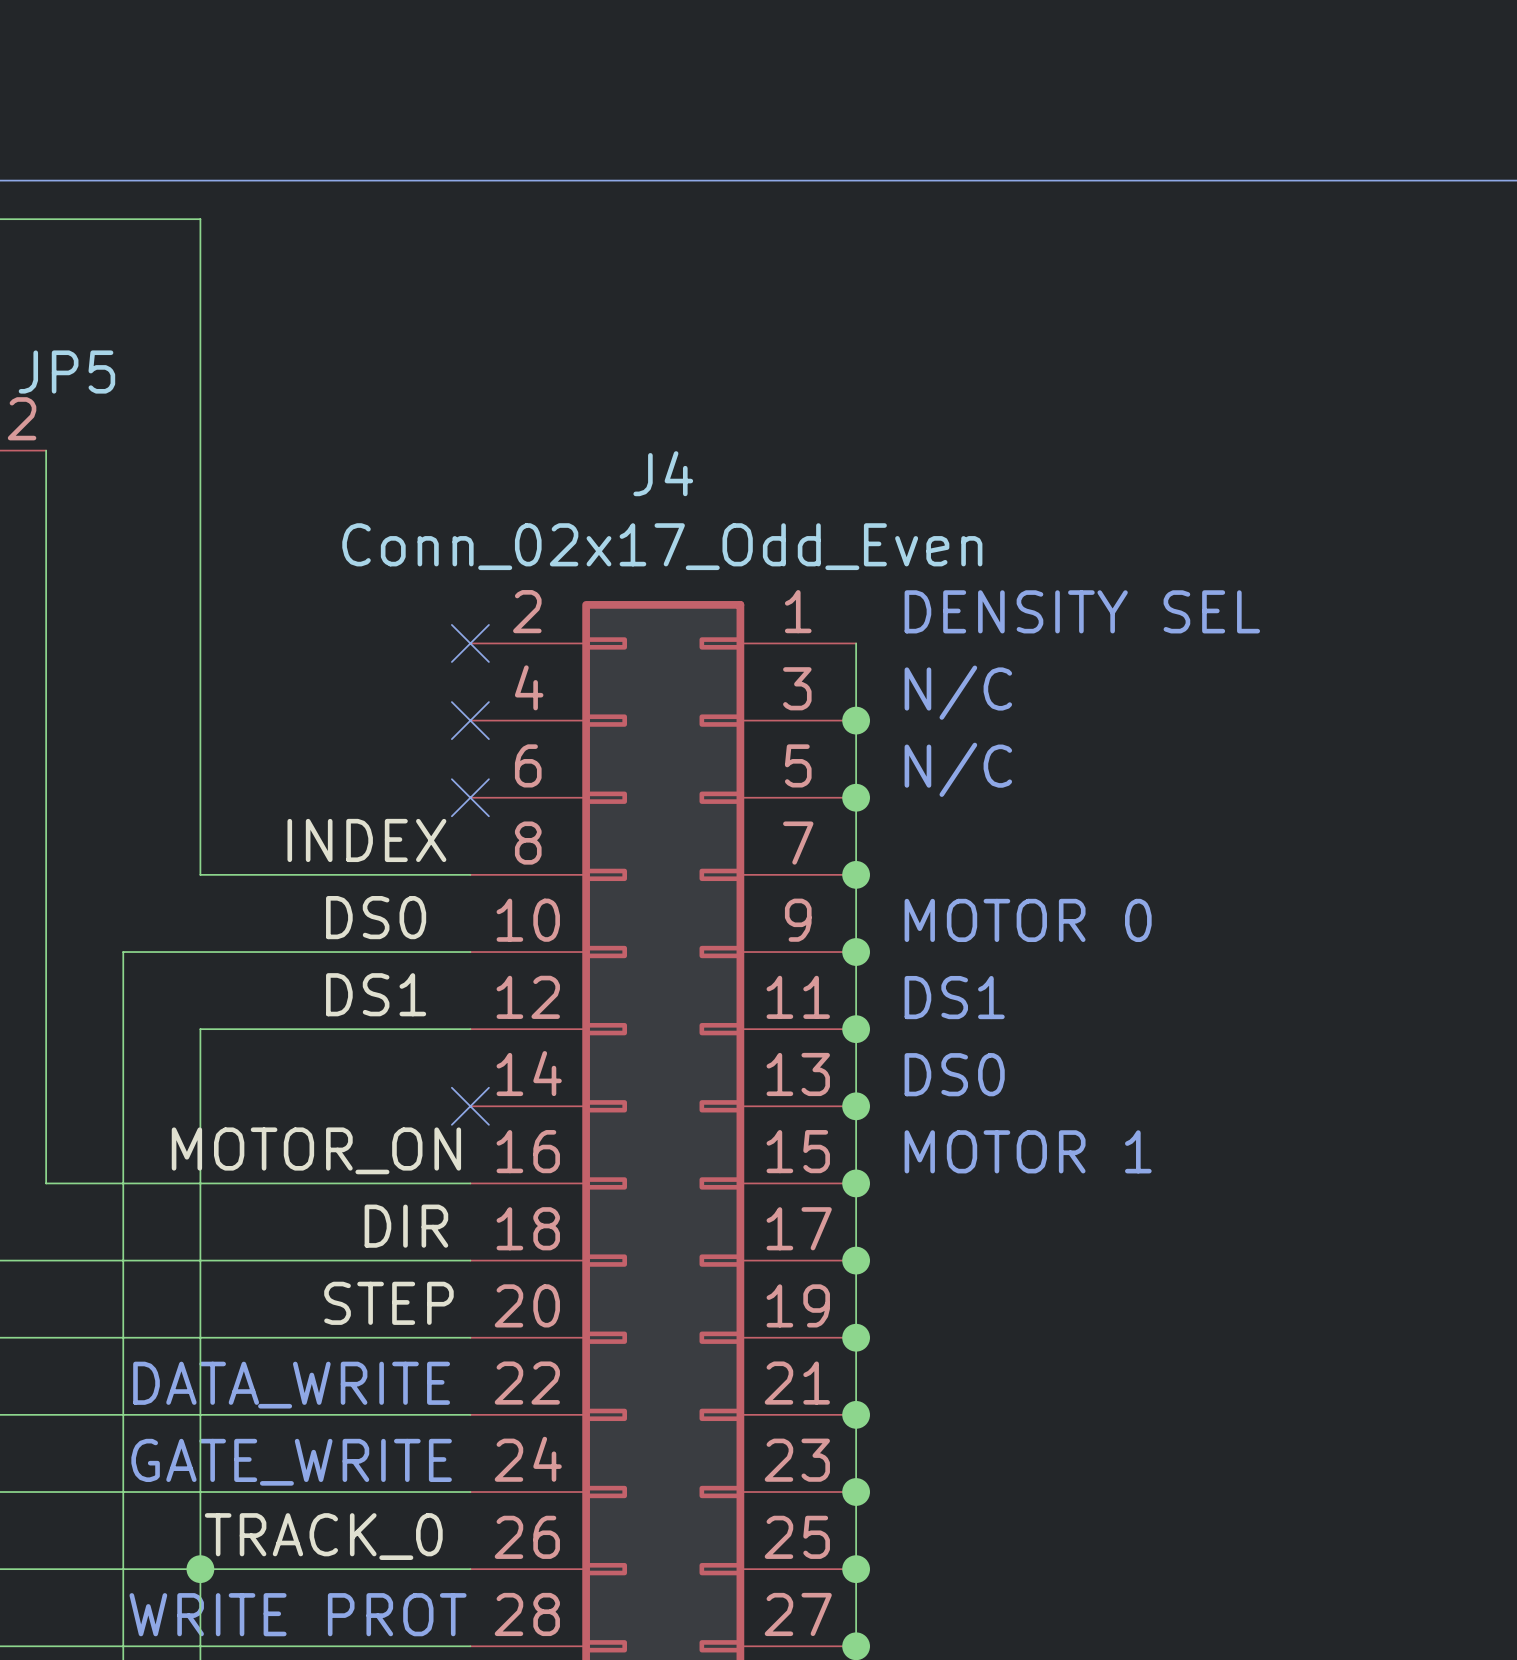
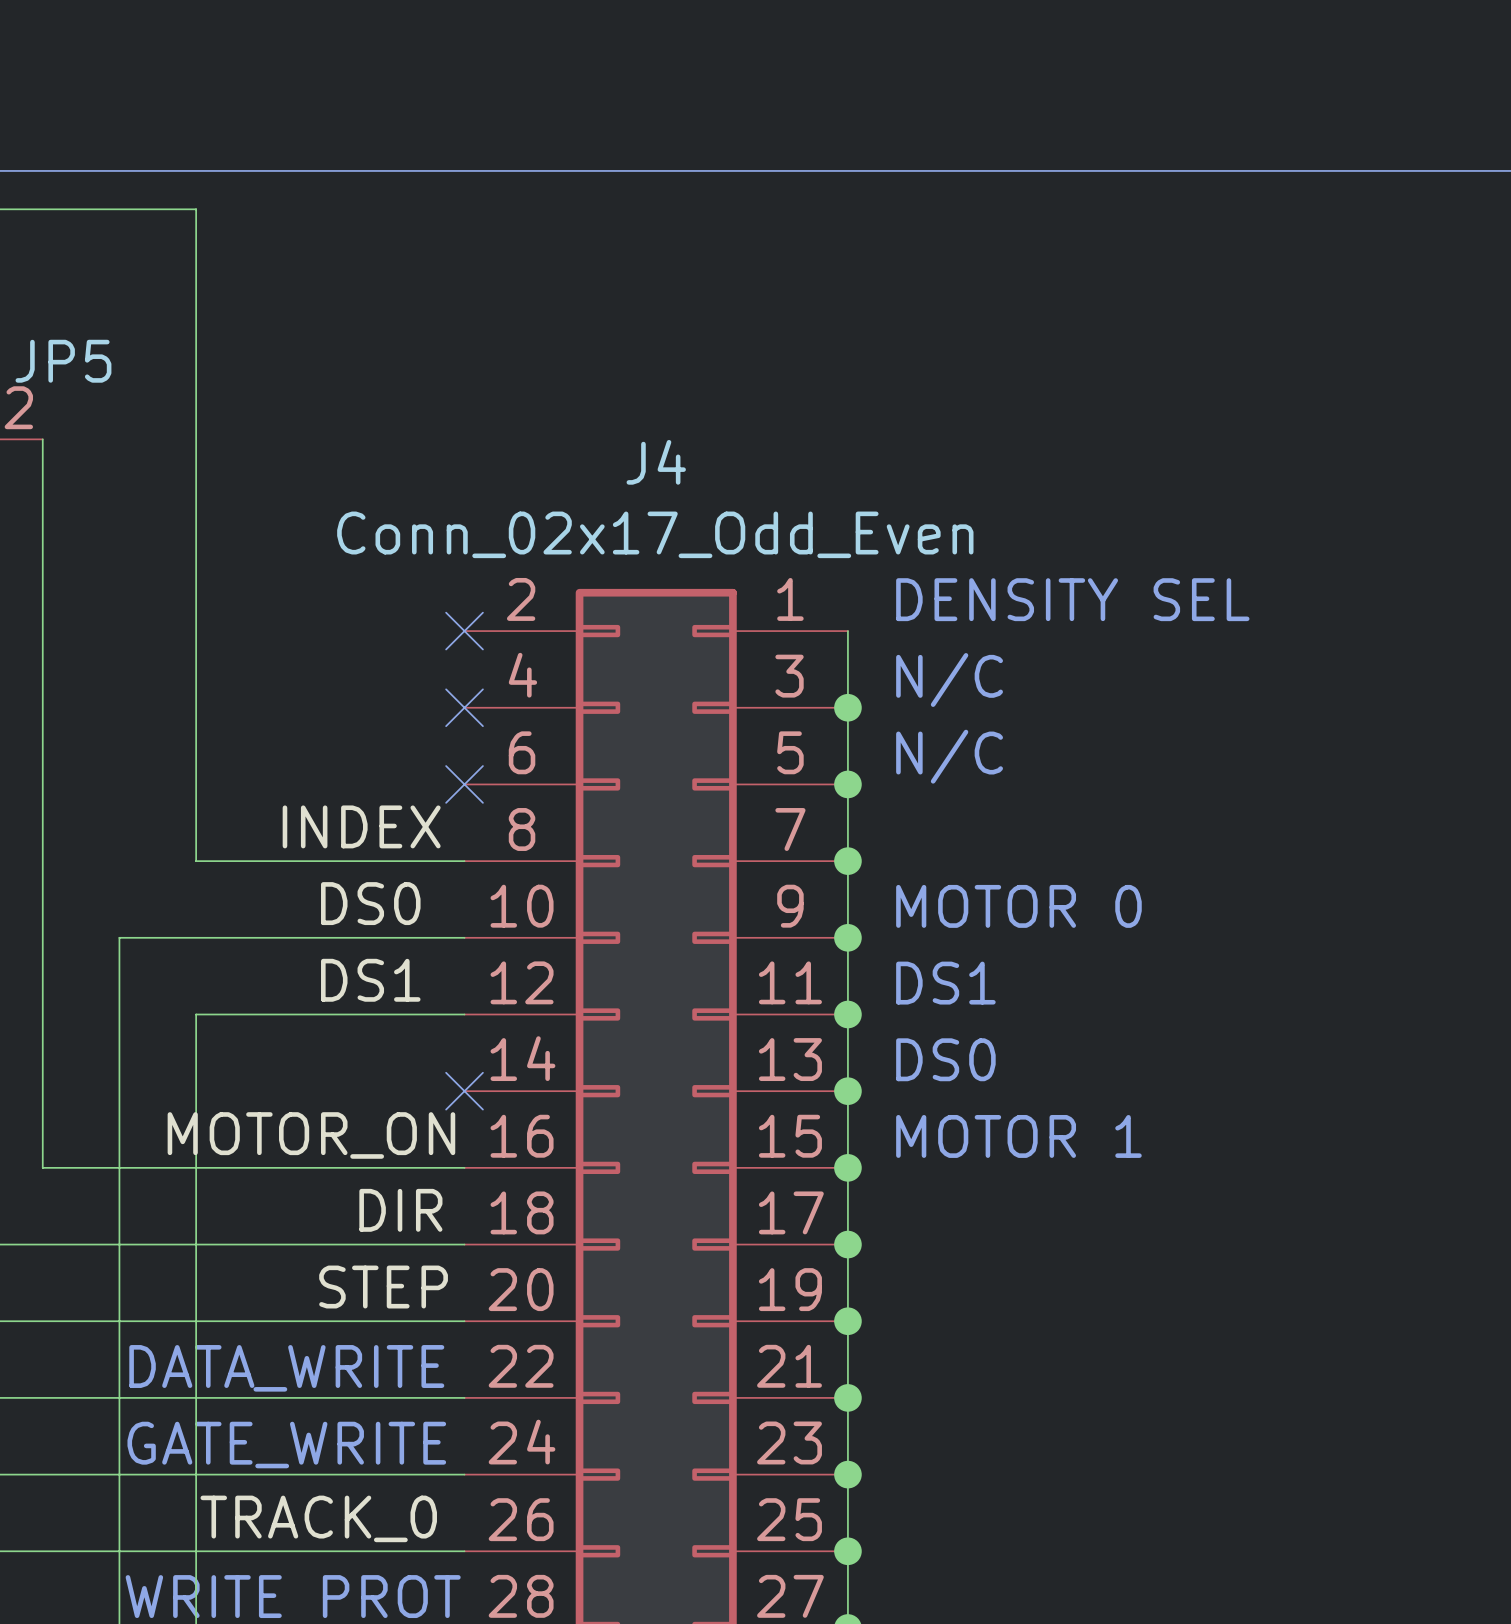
junction: (200, 1569) -> none

